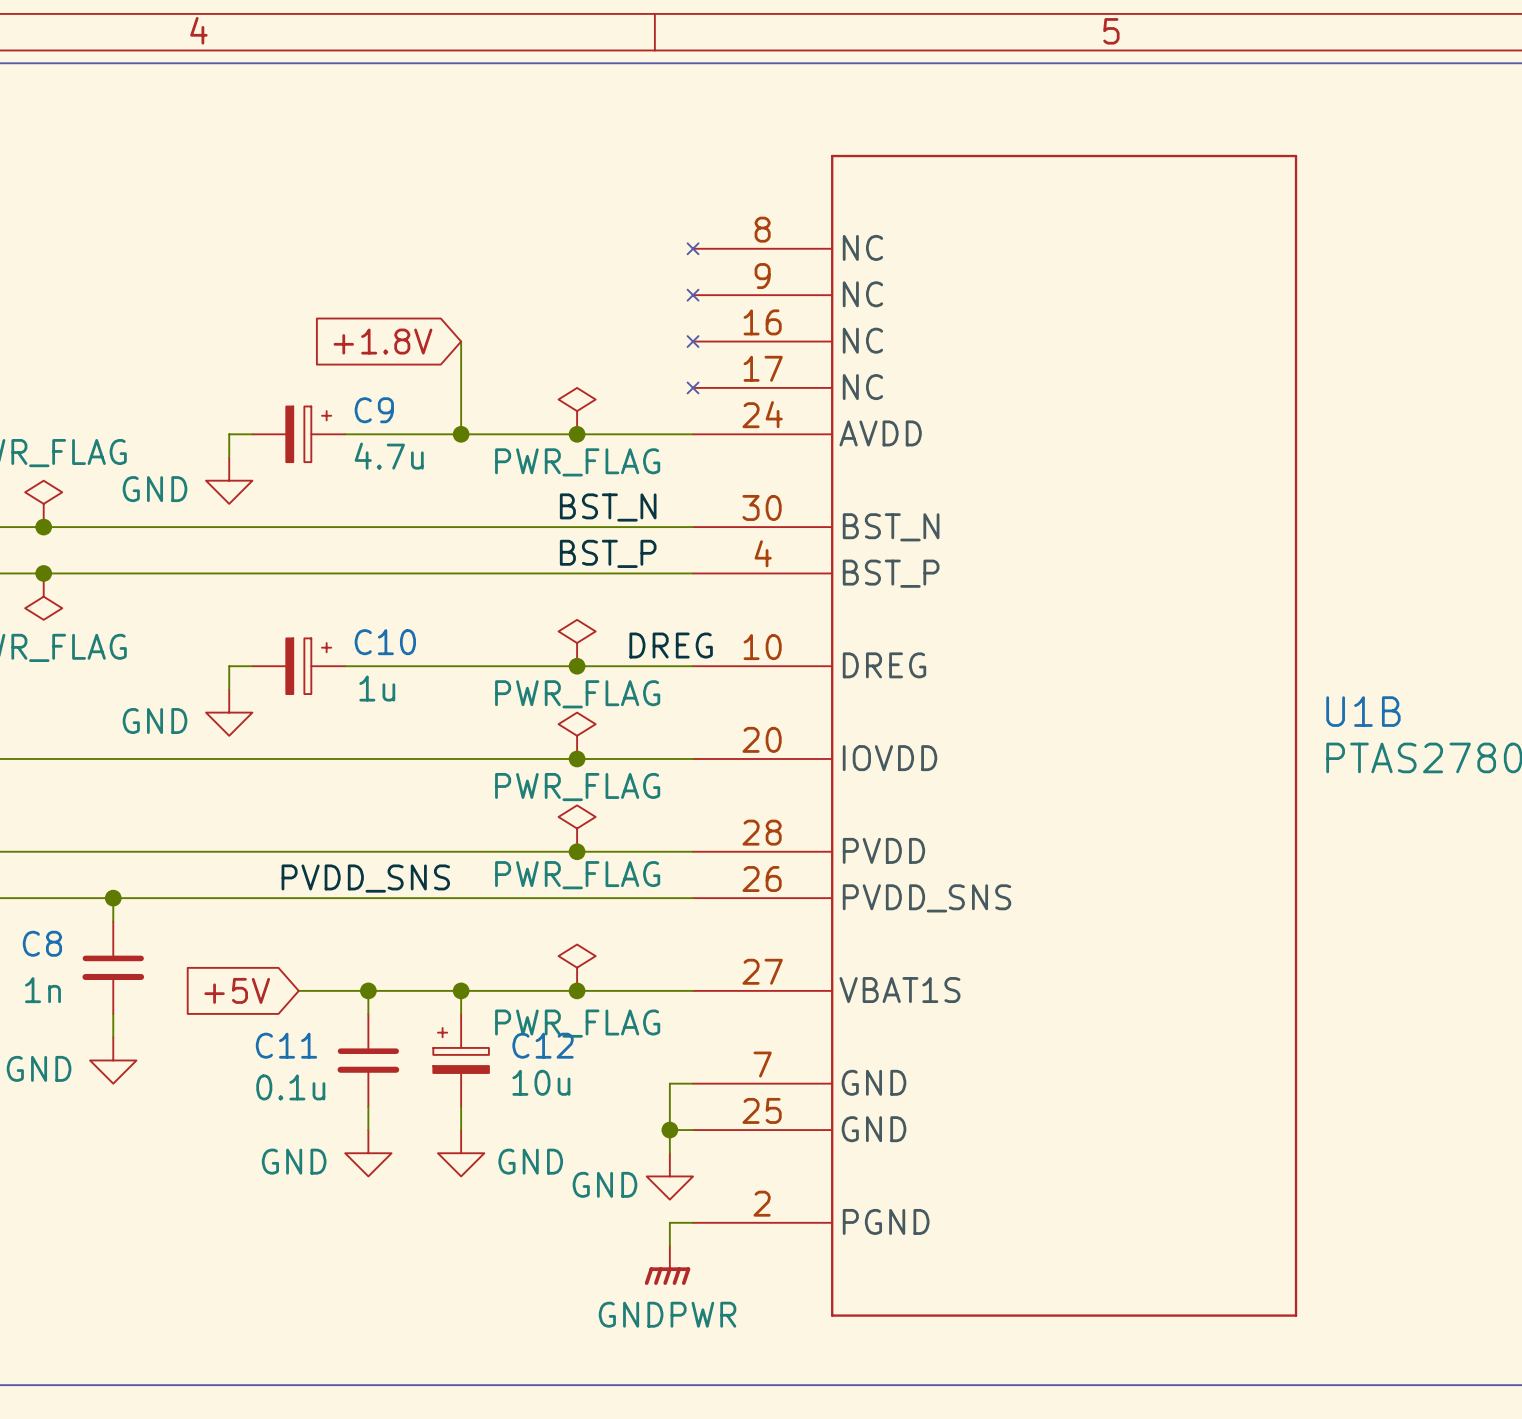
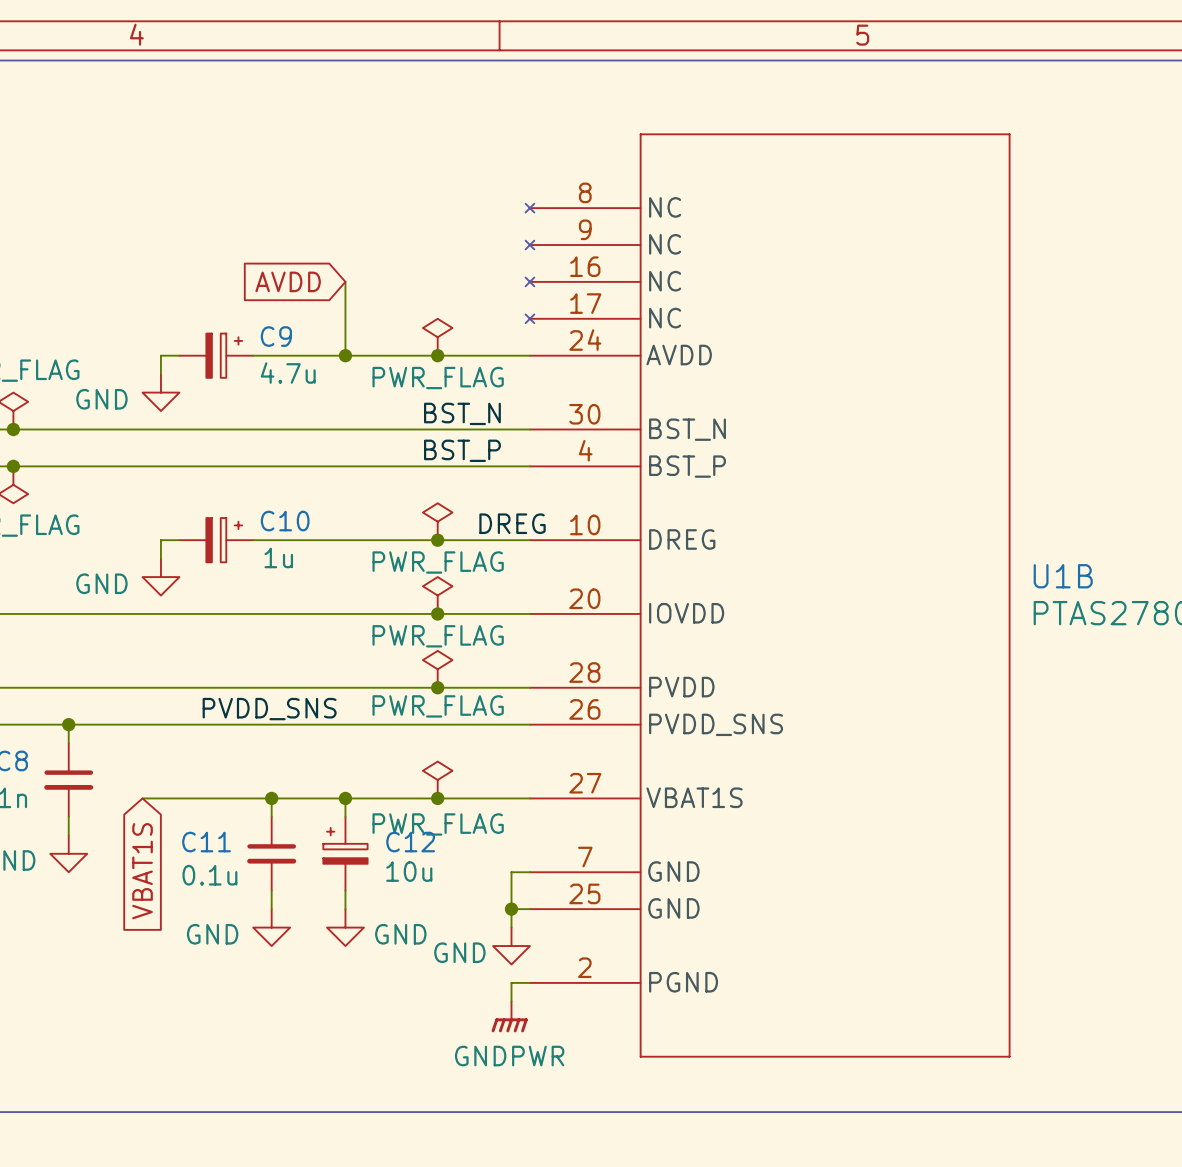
global label: +1.8V (382, 341) -> AVDD (288, 281)
wire: none -> (142, 798) (216, 798)
global label: +5V (237, 990) -> none
global label: none -> VBAT1S (142, 871)

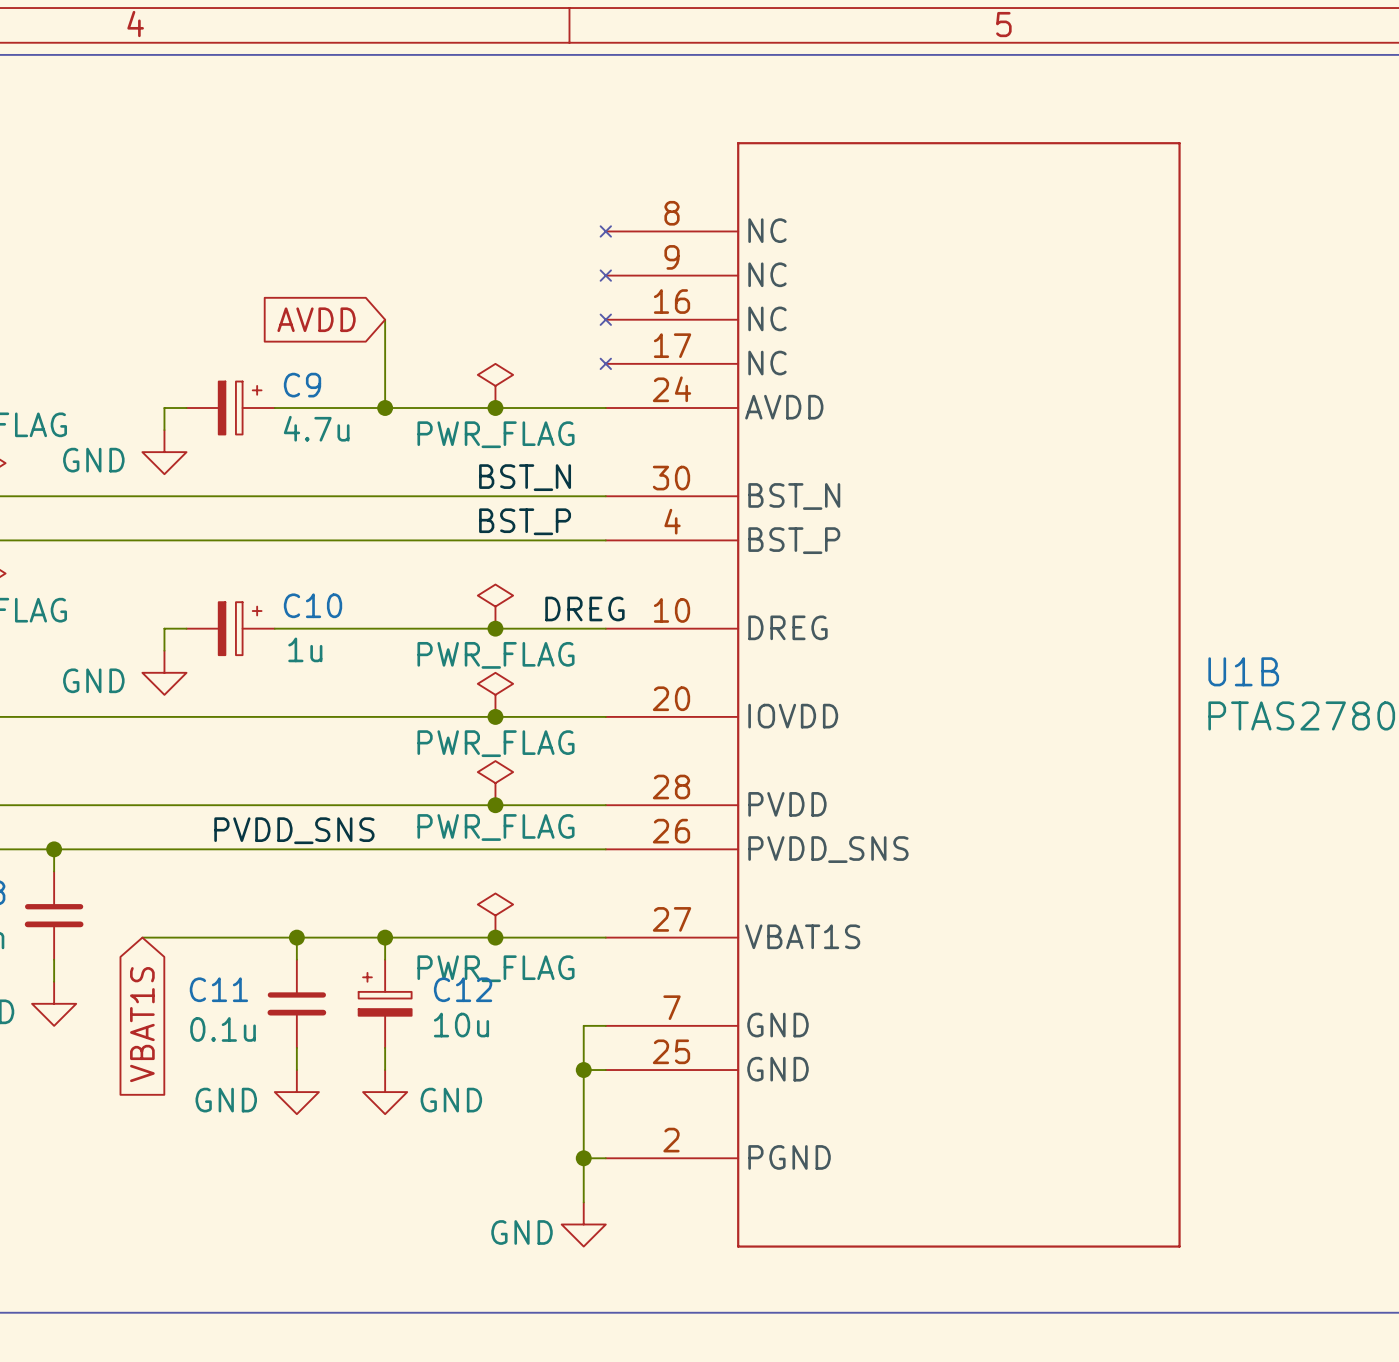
wire: none -> (583, 1092) (583, 1158)
power symbol position: GND (511, 946) -> GND (583, 1224)
junction: none -> (583, 1158)
power symbol: GNDPWR (509, 1016) -> none

